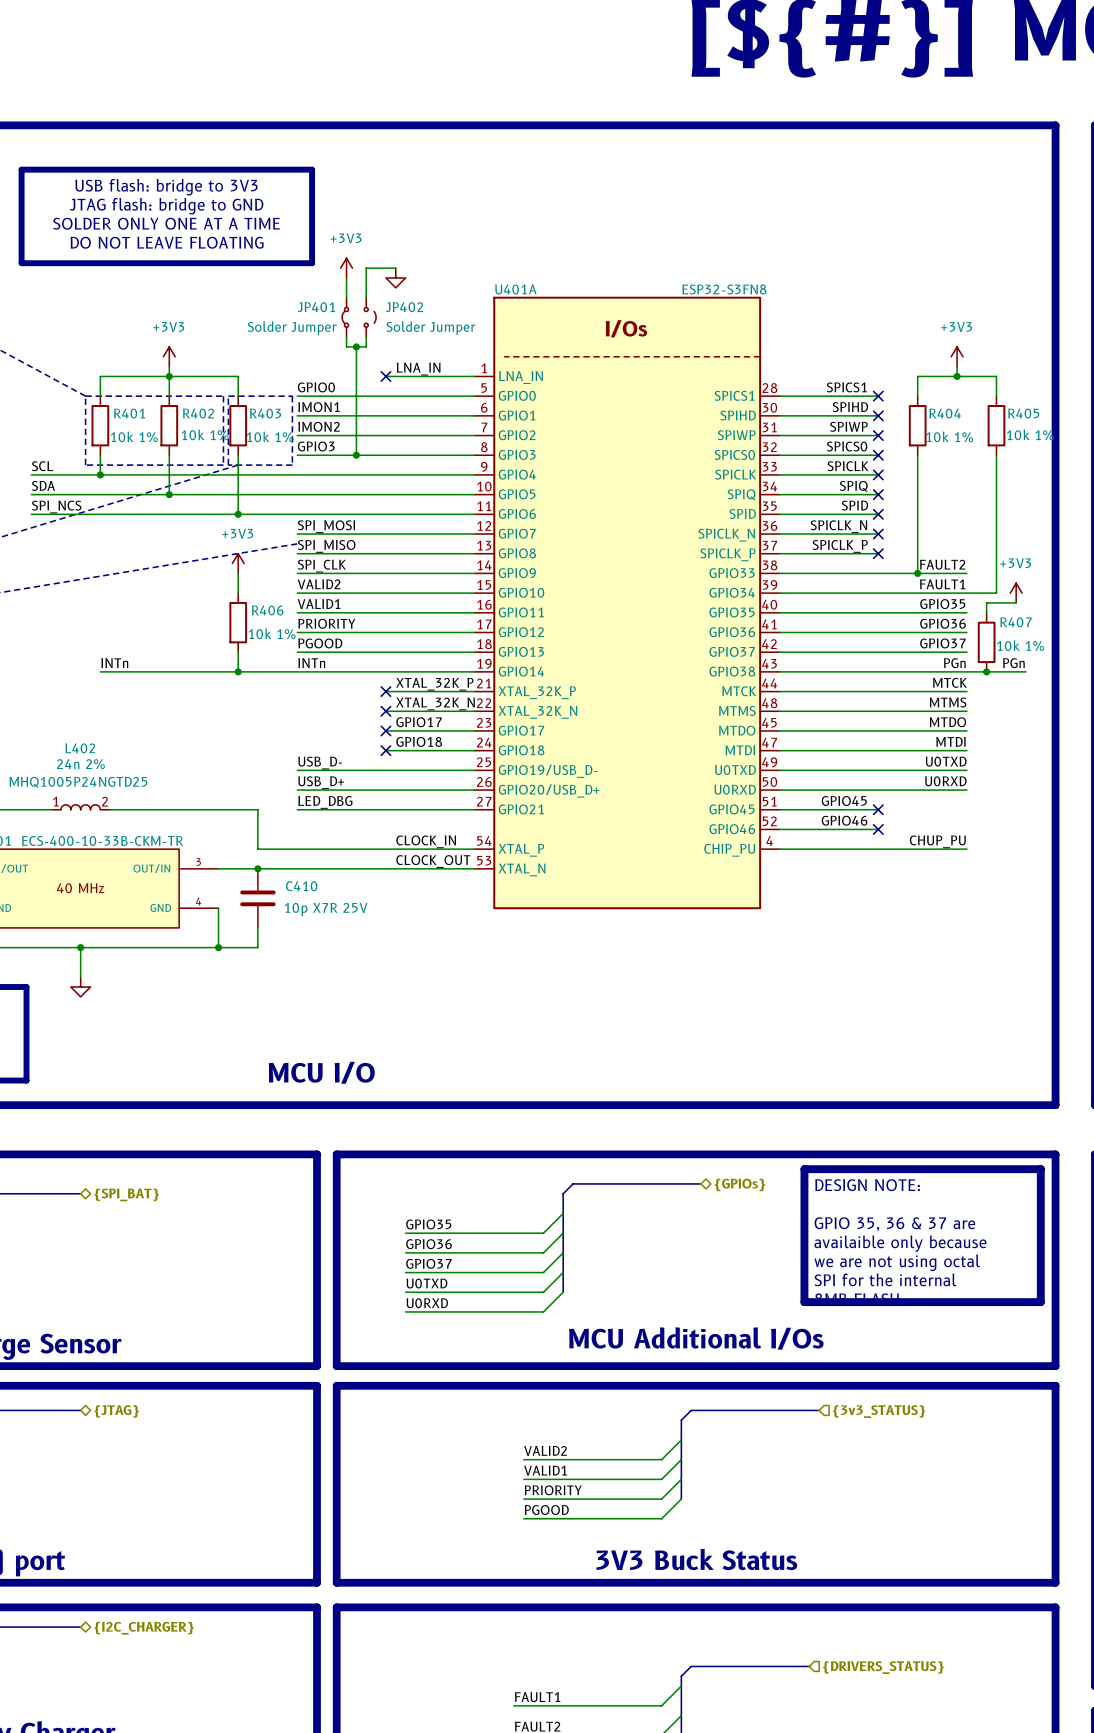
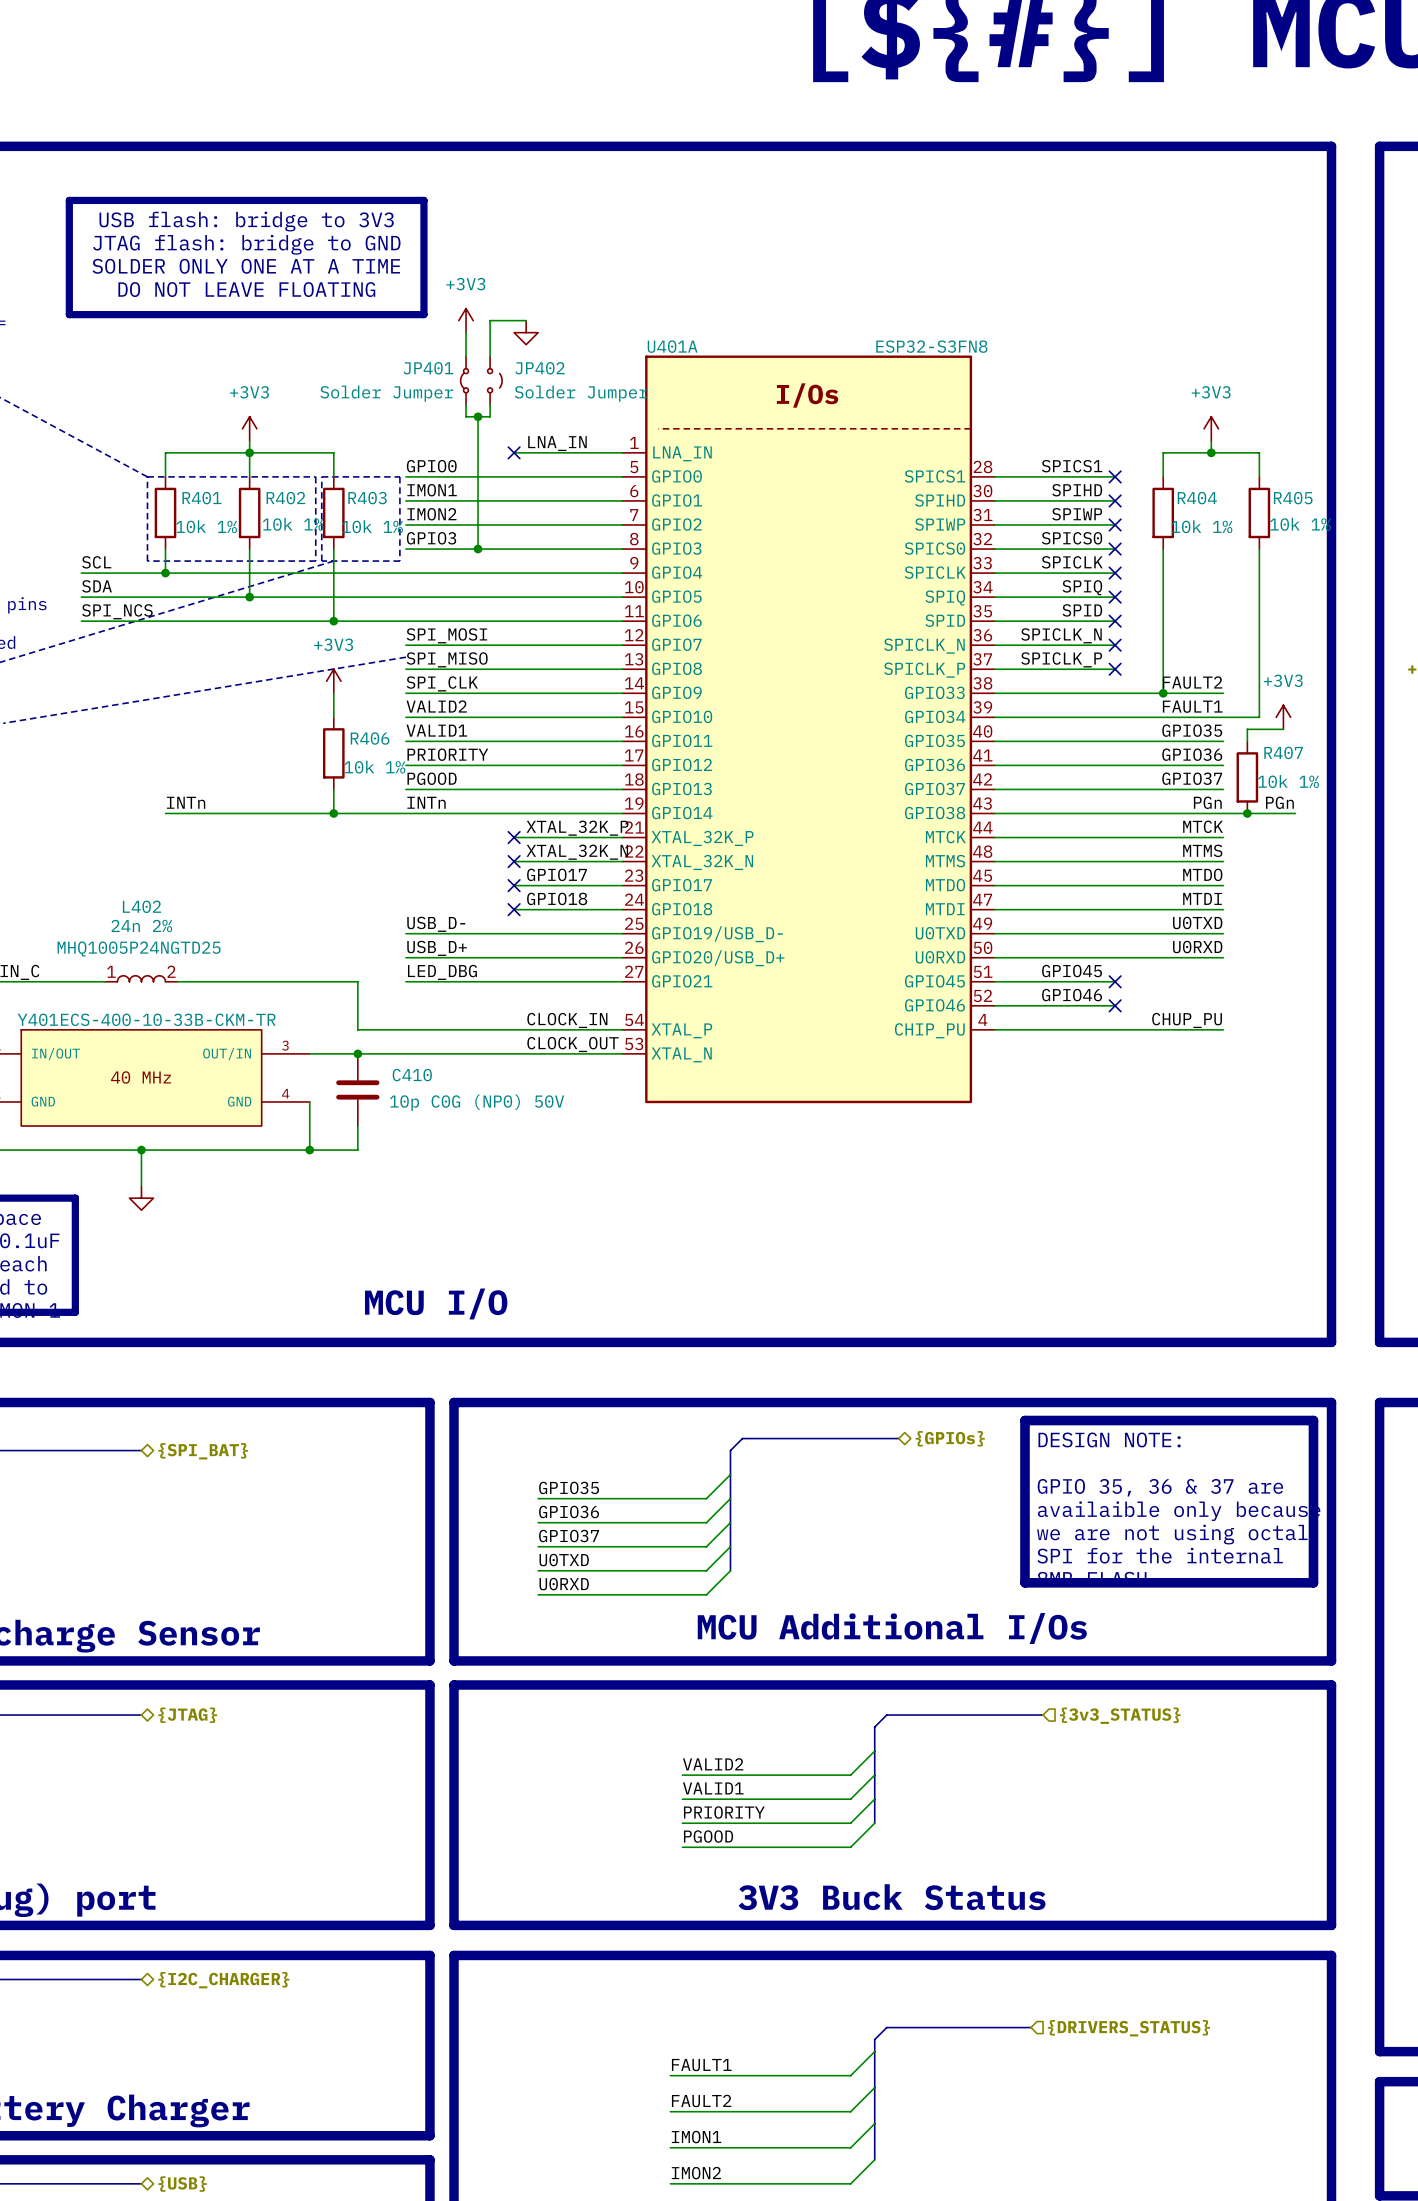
C410 value: 10p X7R 25V (326, 909) -> 10p C0G (NP0) 50V (477, 1102)

